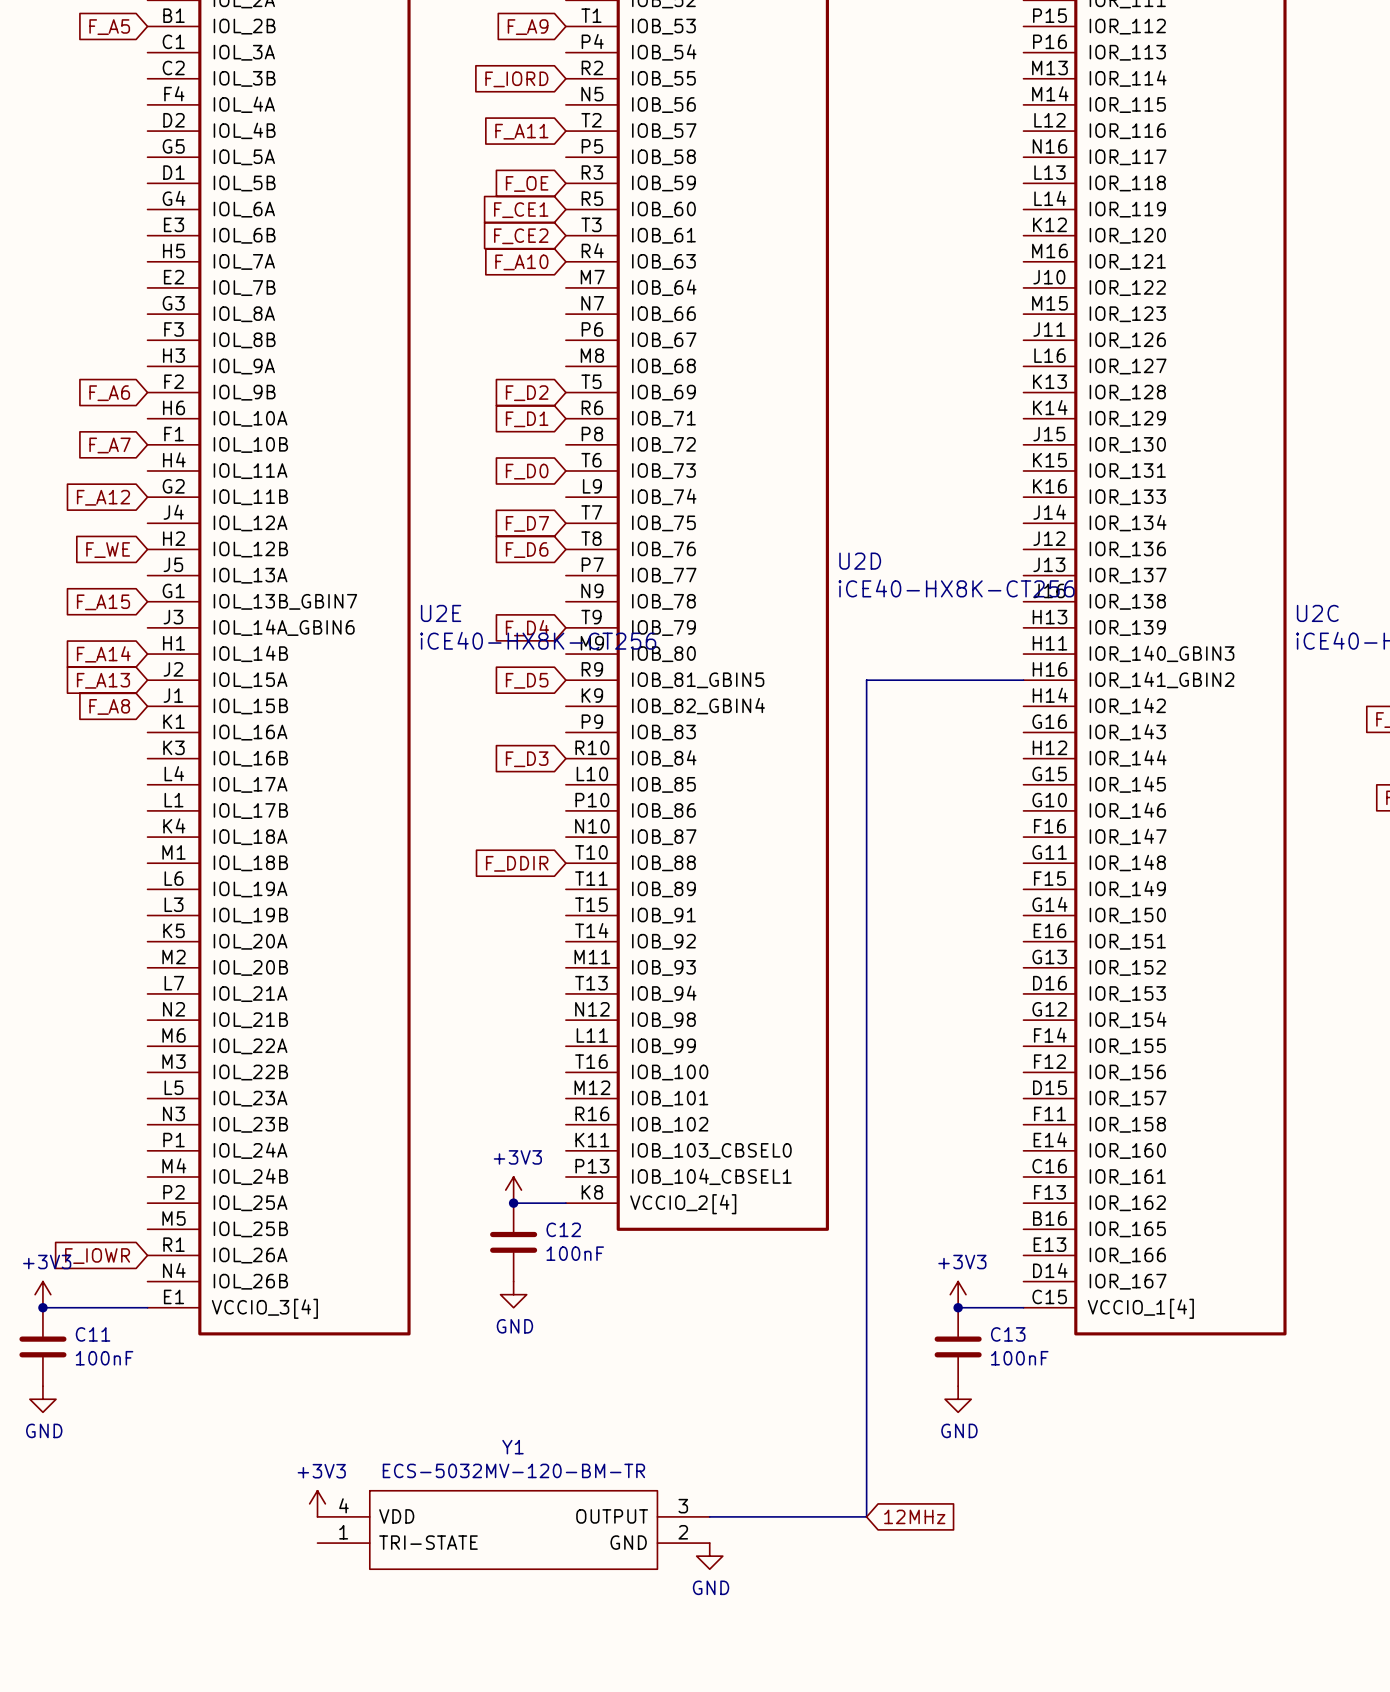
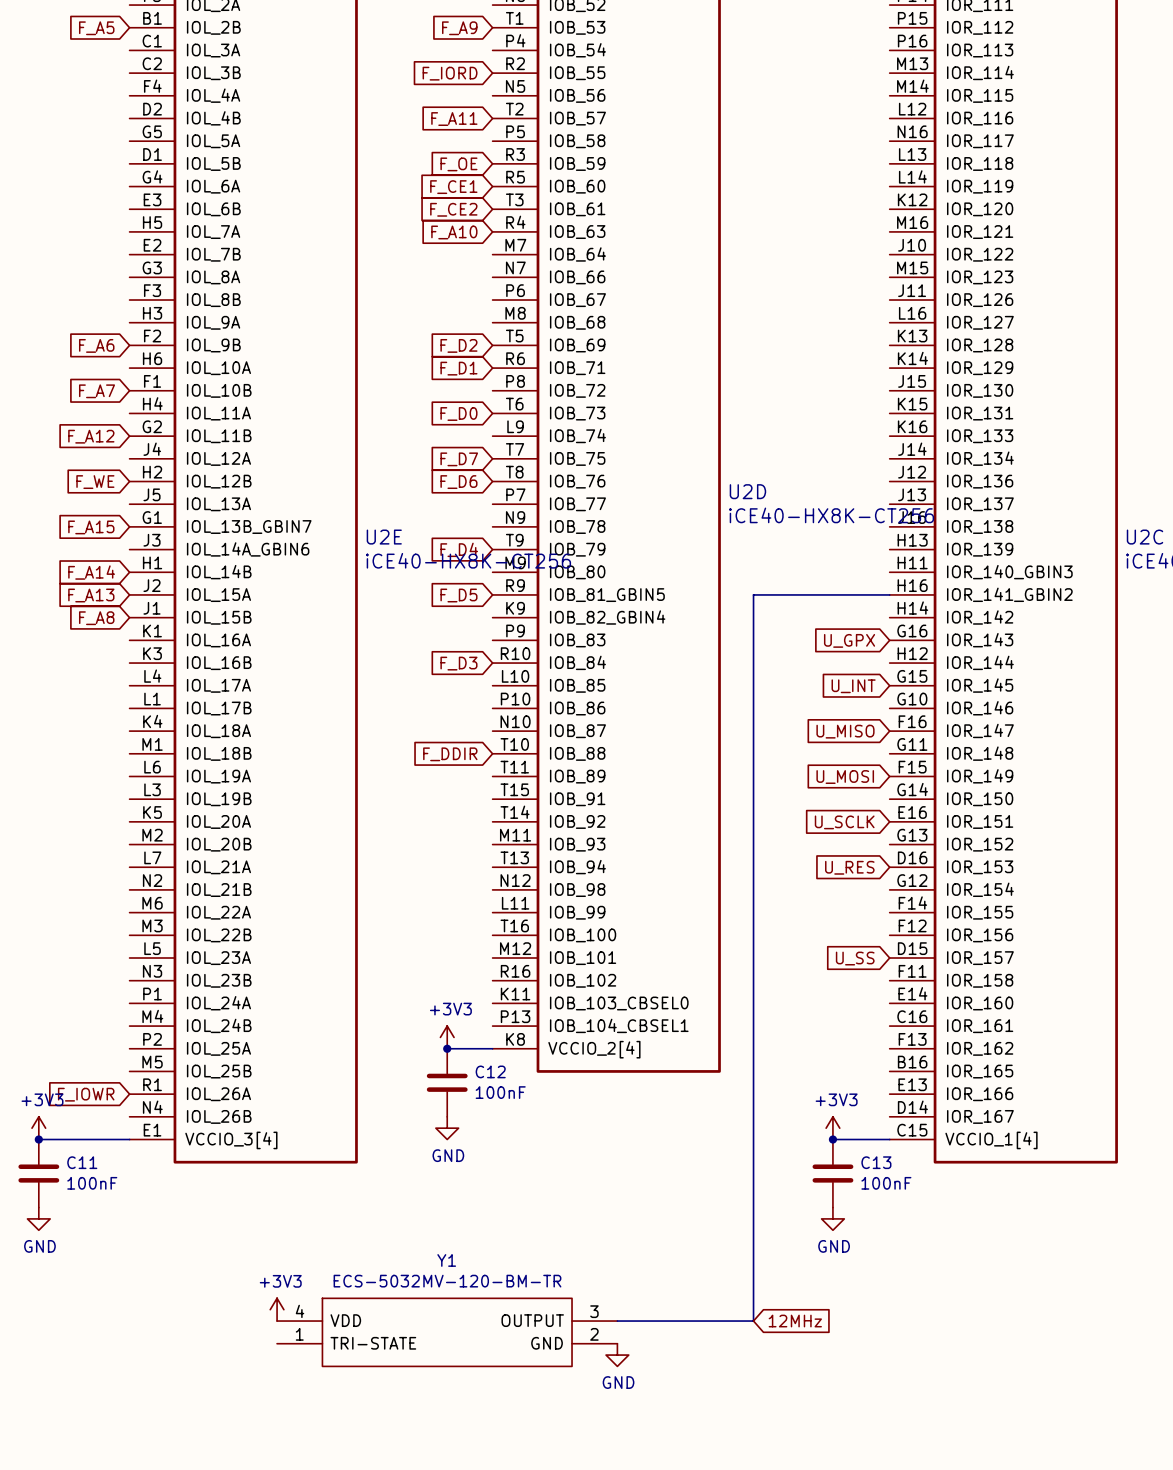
global label: none -> U_GPX (849, 640)
global label: none -> U_INT (853, 686)
global label: none -> U_MISO (845, 731)
global label: none -> U_MOSI (845, 777)
global label: none -> U_SCLK (844, 822)
global label: none -> U_RES (849, 867)
global label: none -> U_SS (855, 958)

